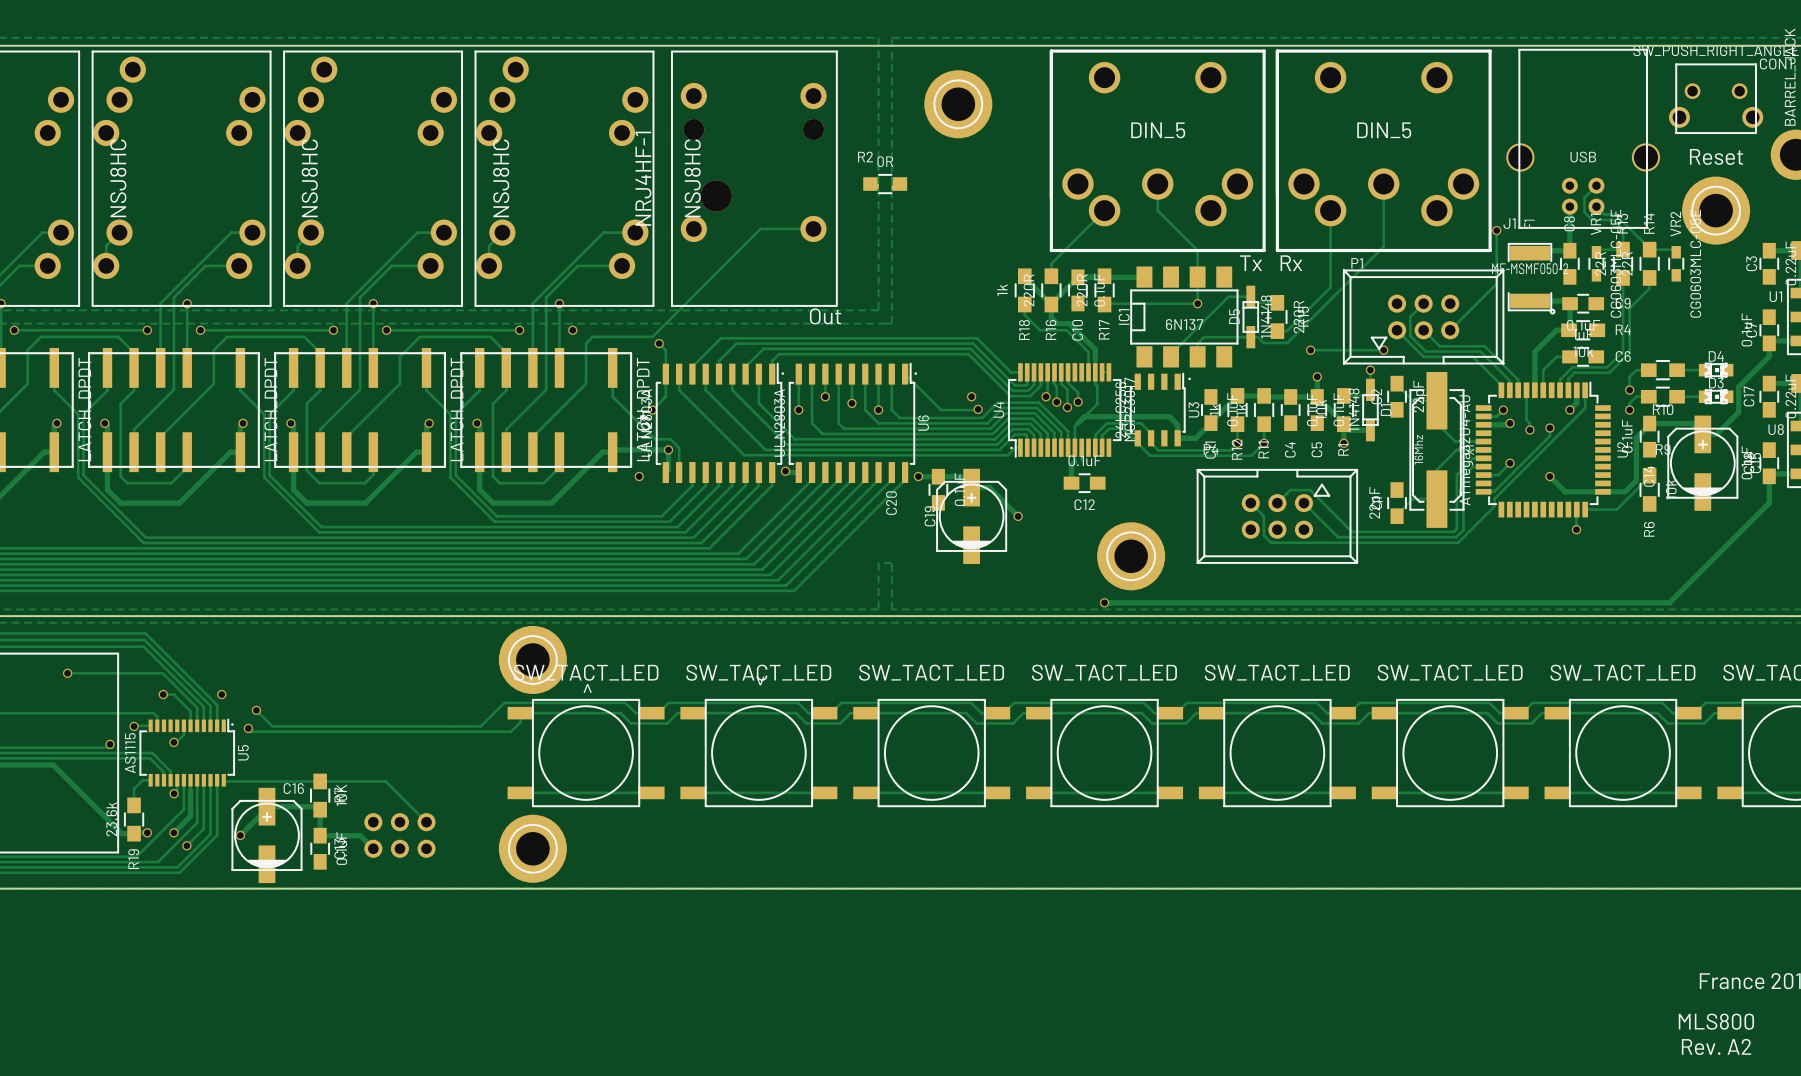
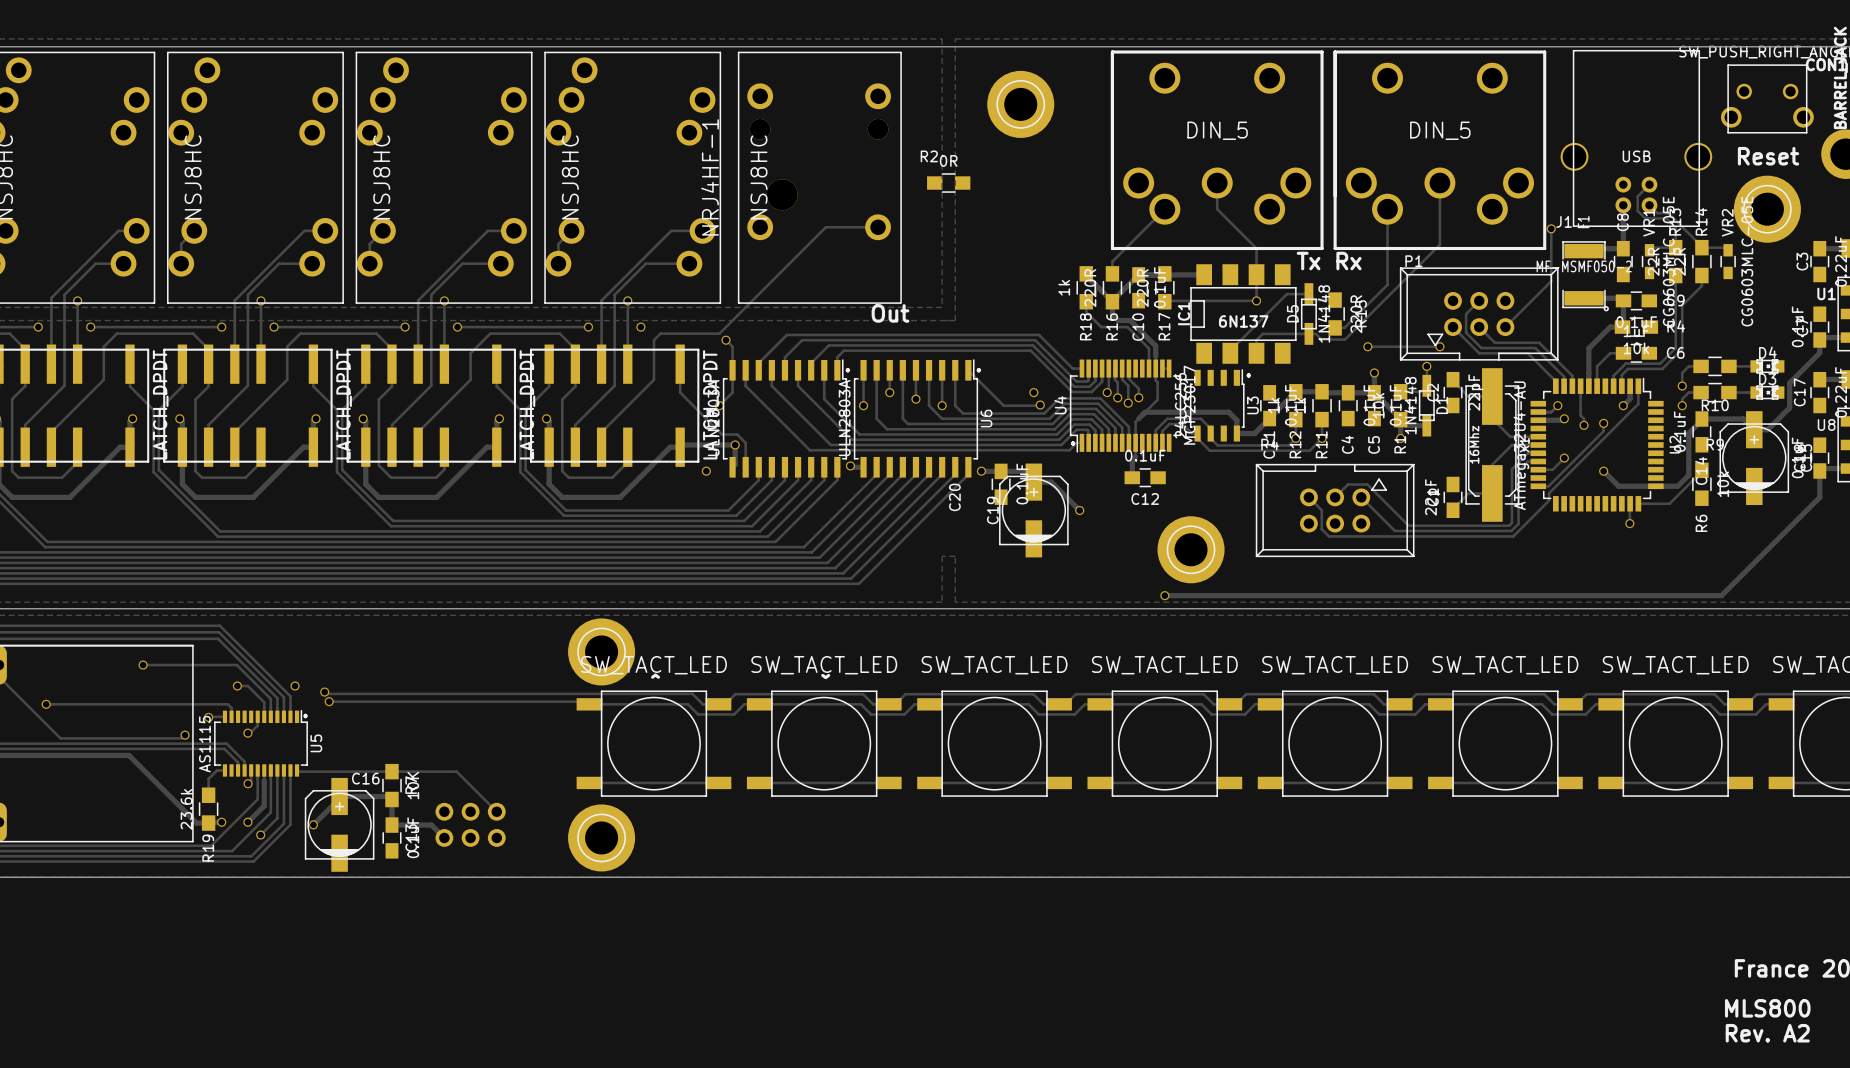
track: (625, 702) (504, 702) (480, 726) (272, 726) (256, 710) -> (692, 694) (326, 693) (324, 692)
track: (520, 713) (520, 722) (510, 731) (251, 731) (248, 728) -> (589, 704) (586, 701) (333, 702)
via position: (248, 728) -> (324, 692)

